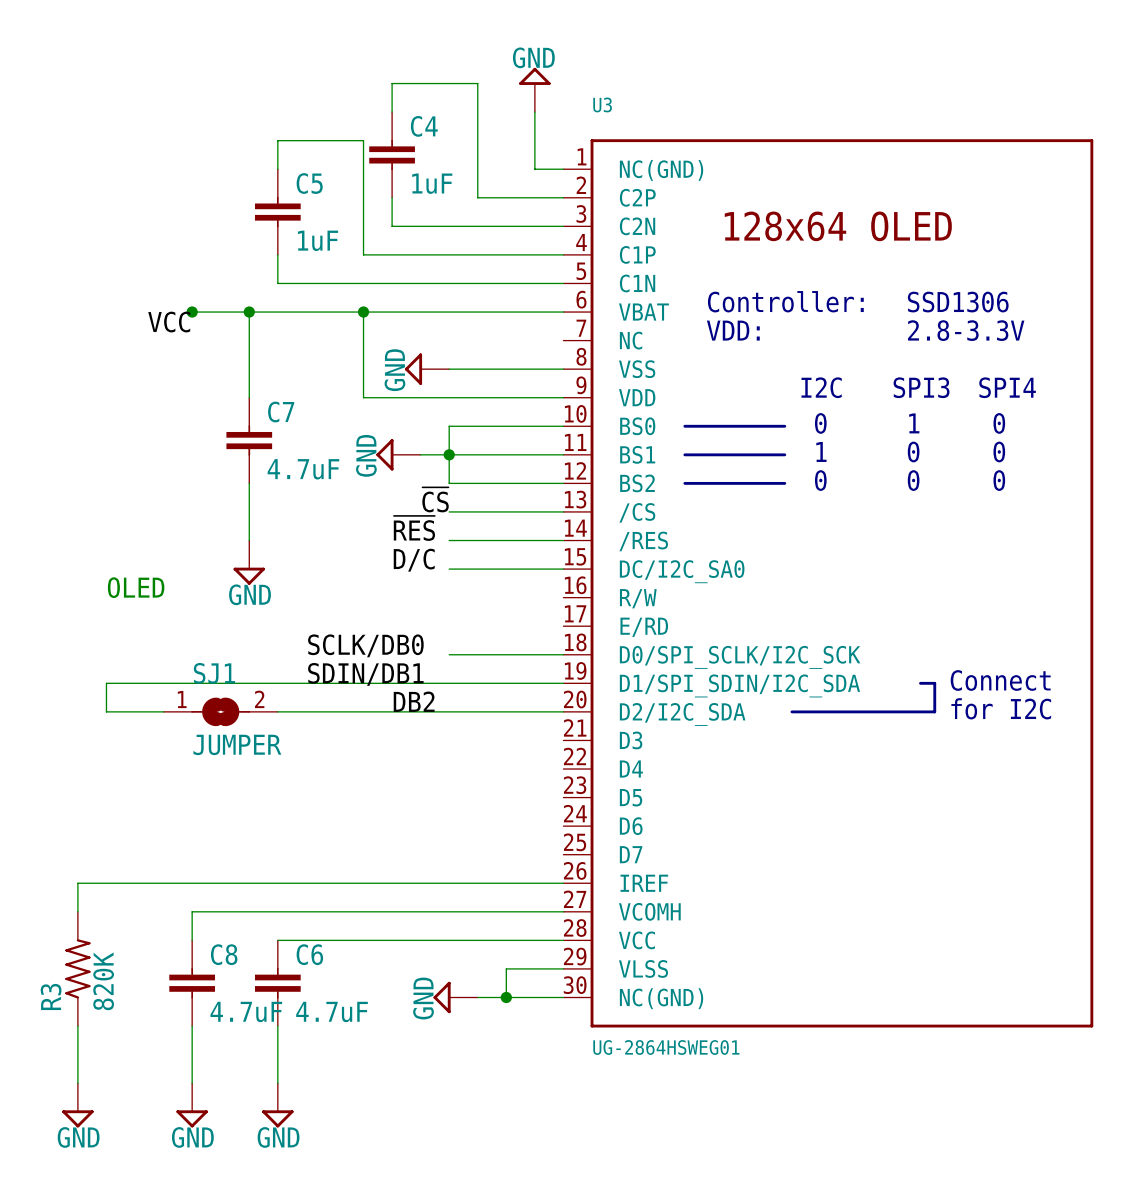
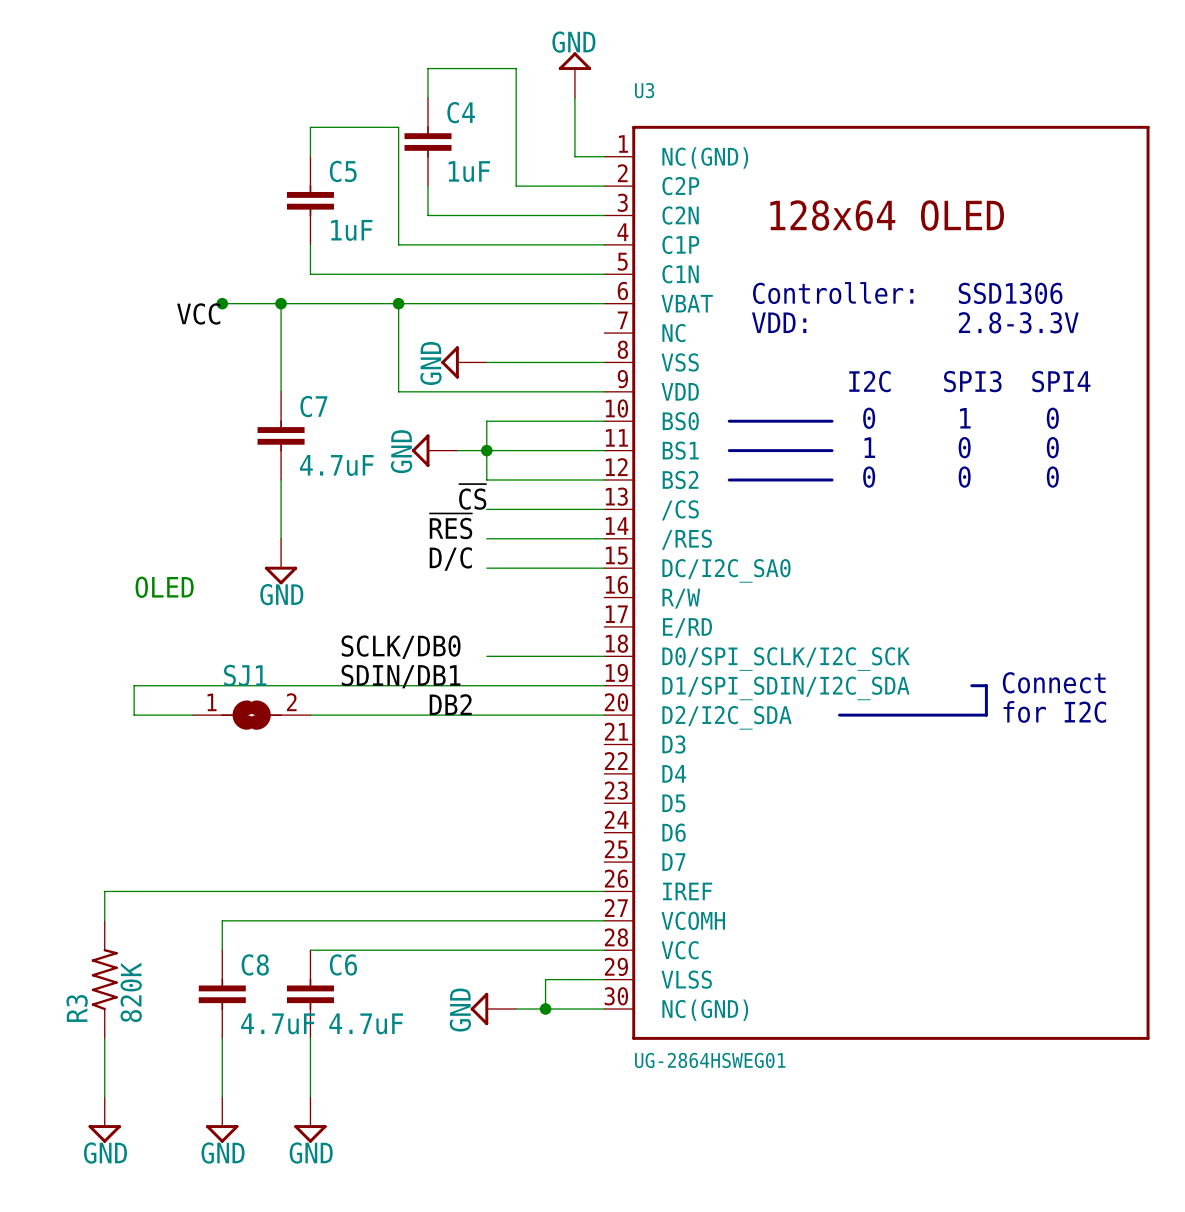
SJ1 value: JUMPER (237, 744) -> none

